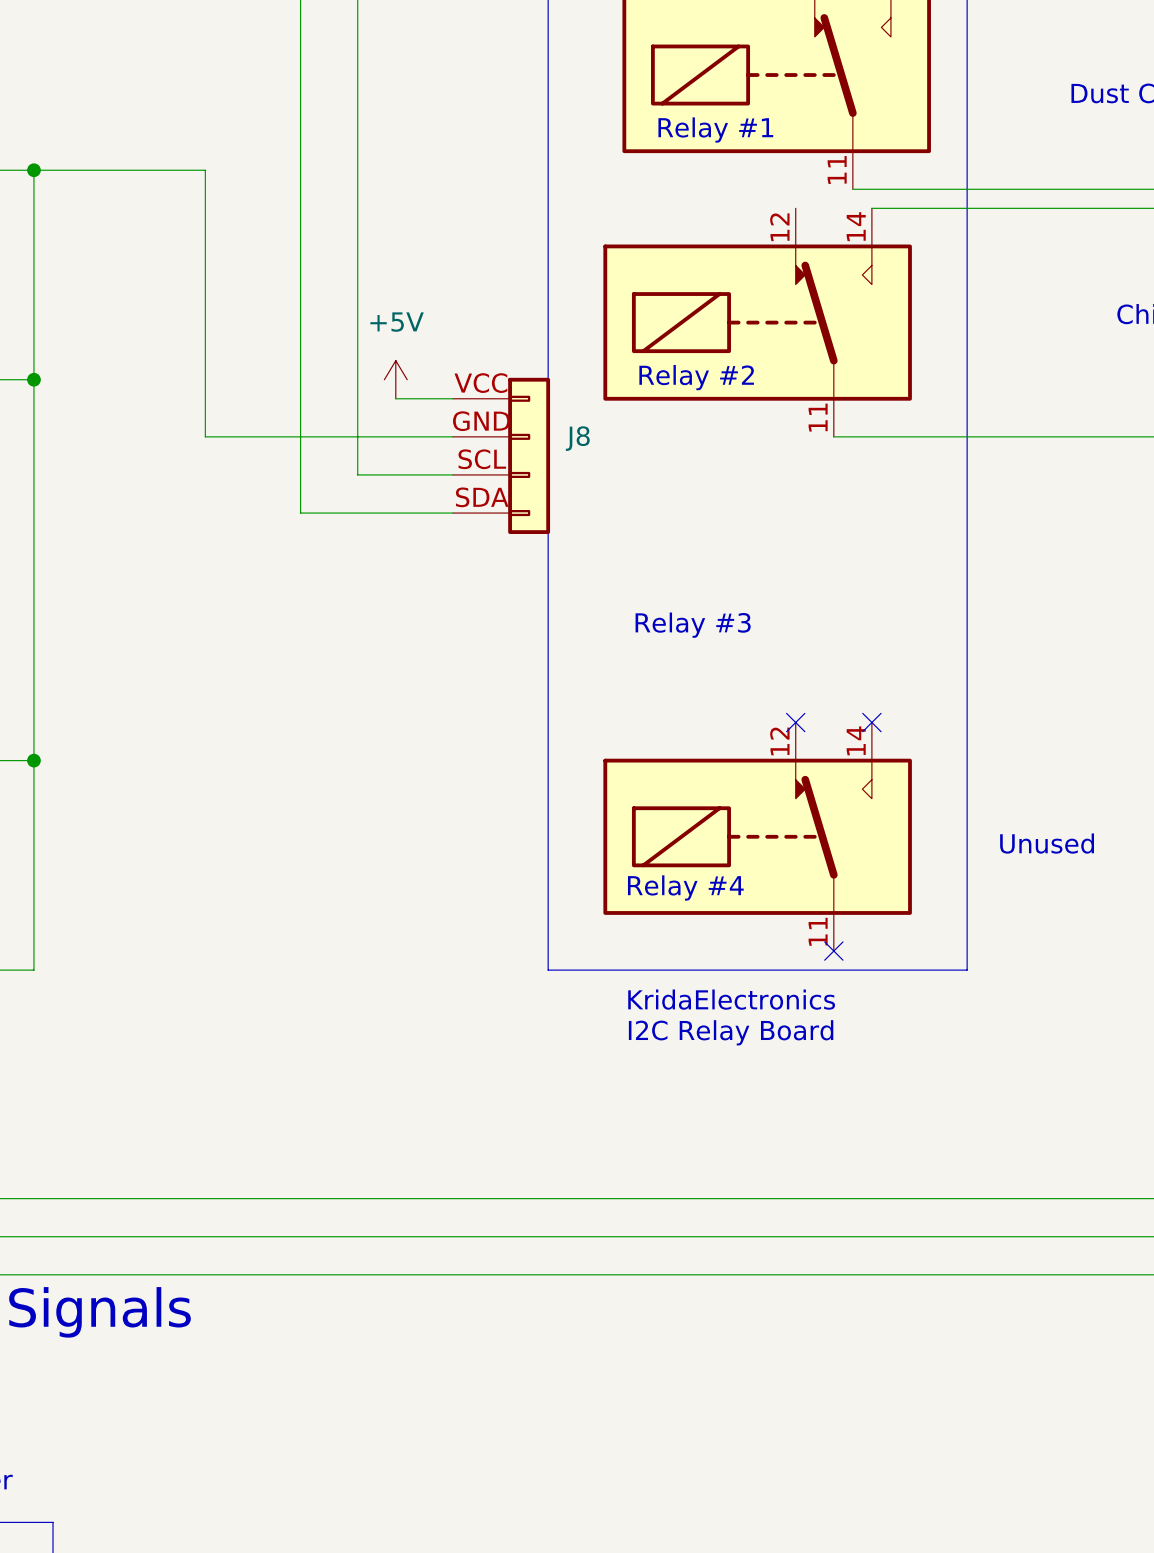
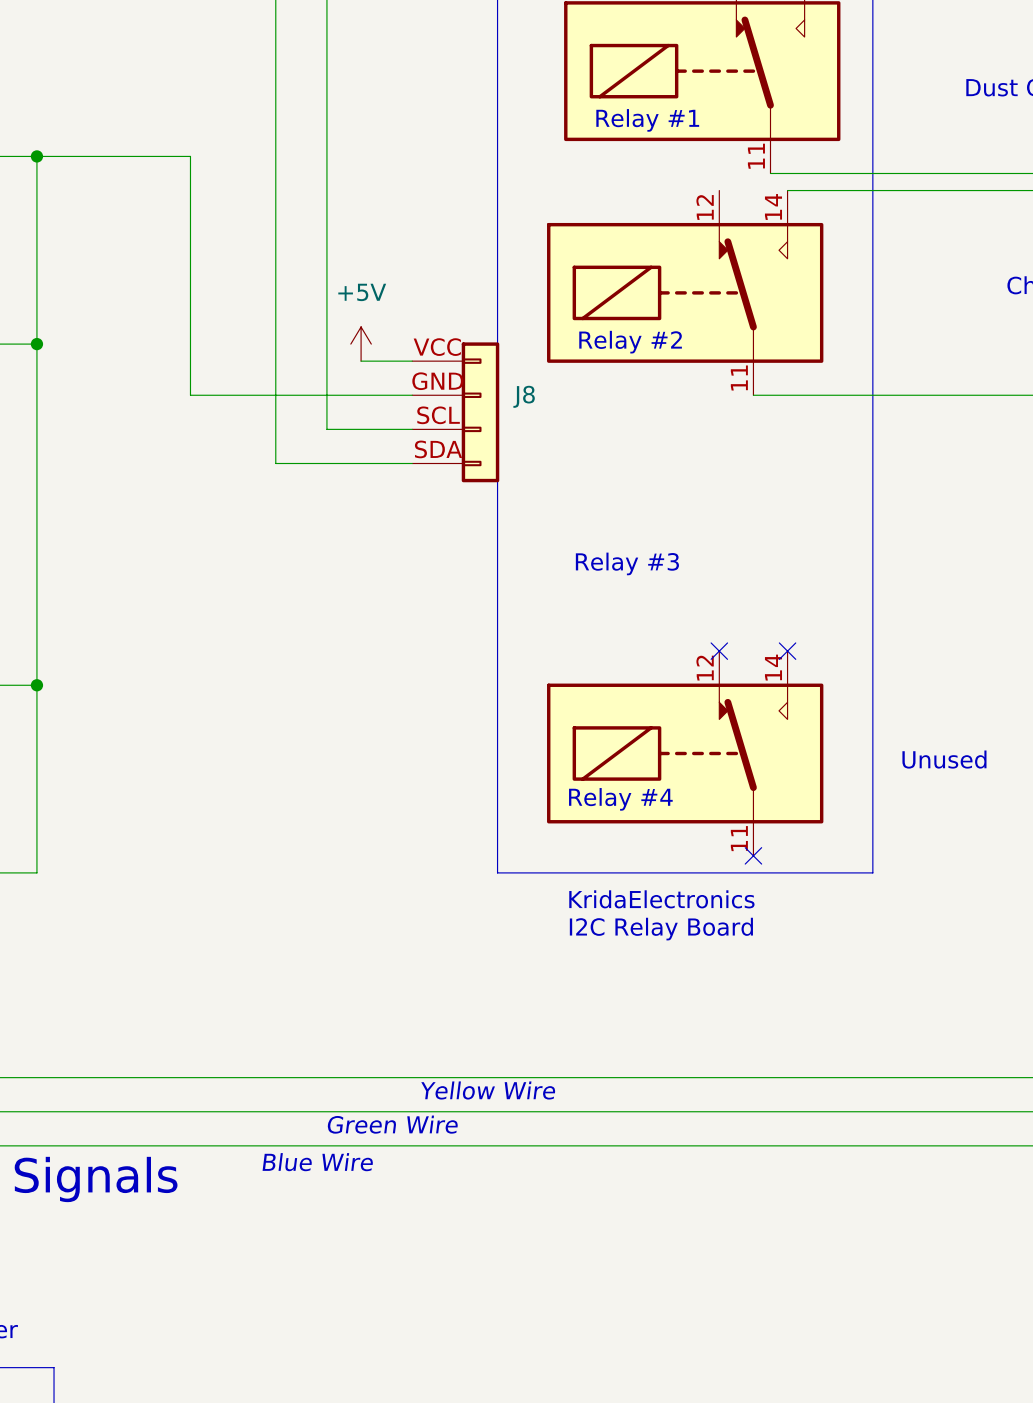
text: none -> Yellow Wire (488, 1090)
text: none -> Green Wire (392, 1124)
text: none -> Blue Wire (317, 1162)

